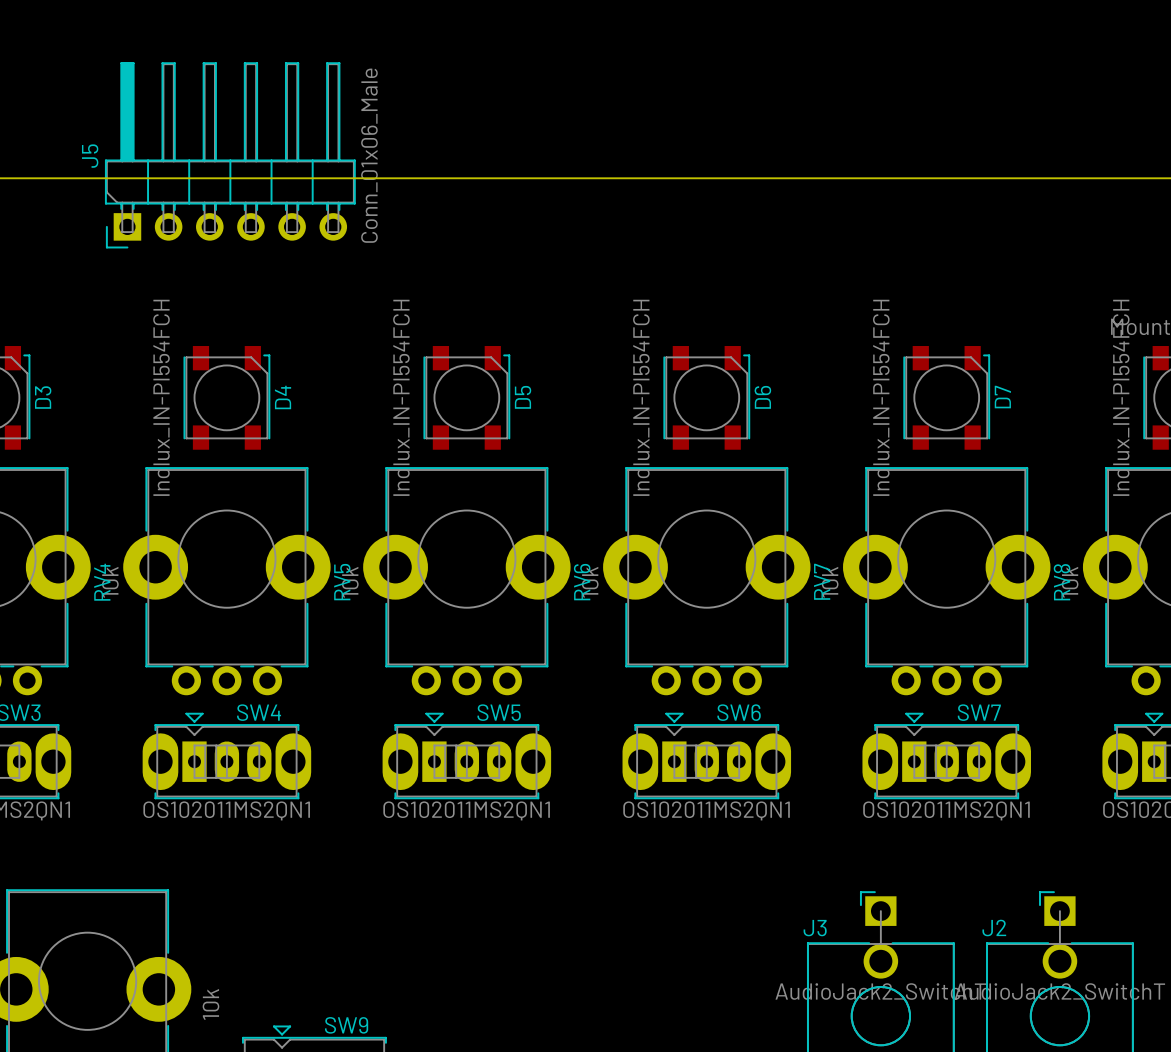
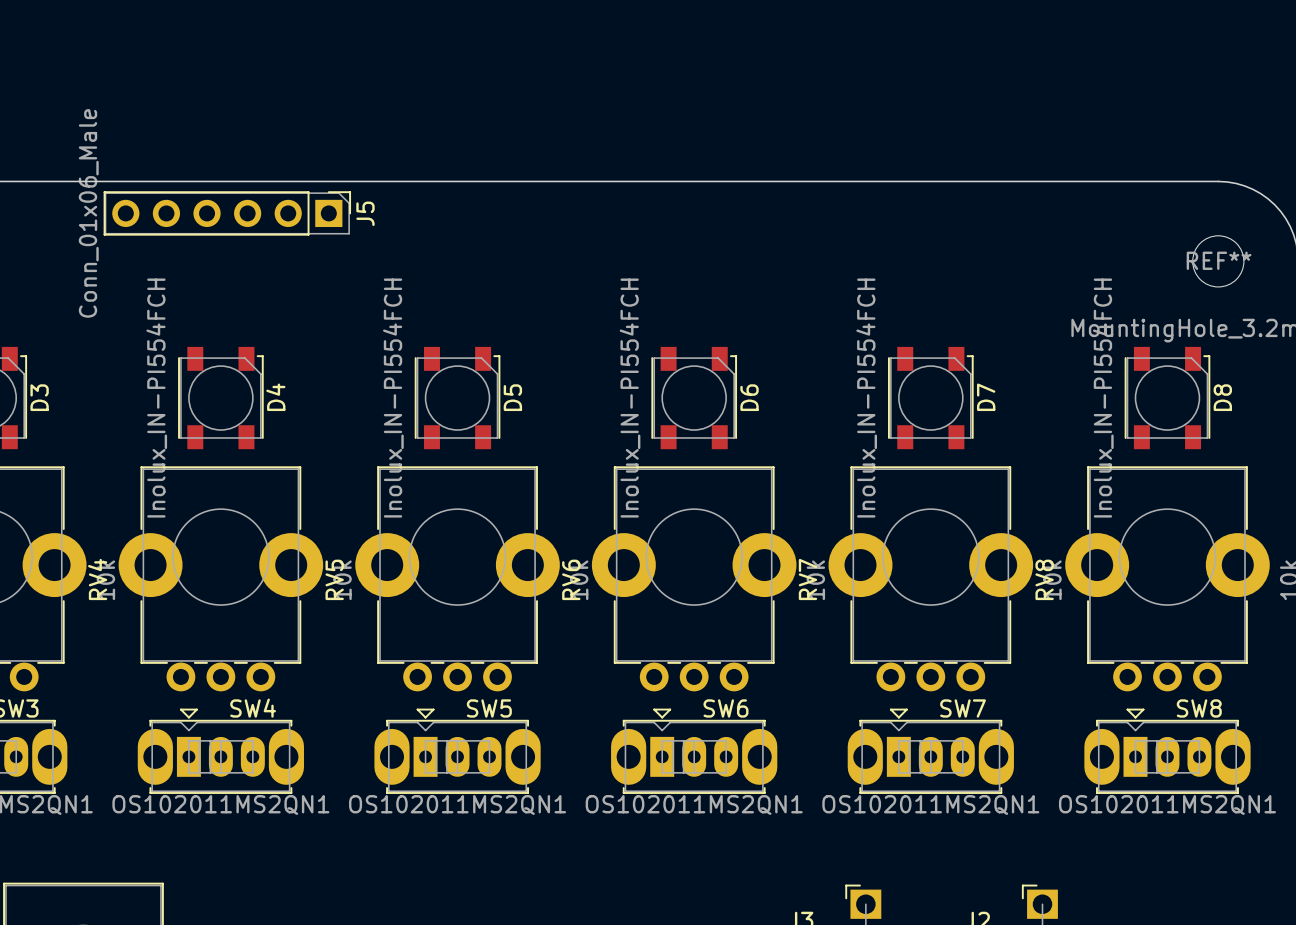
J5 footprint: [104, 62, 356, 249] -> [103, 191, 352, 236]
J5 value position: Conn_01x06_Male (369, 155) -> Conn_01x06_Male (88, 213)
J5 name position: J5 (90, 156) -> J5 (365, 213)

